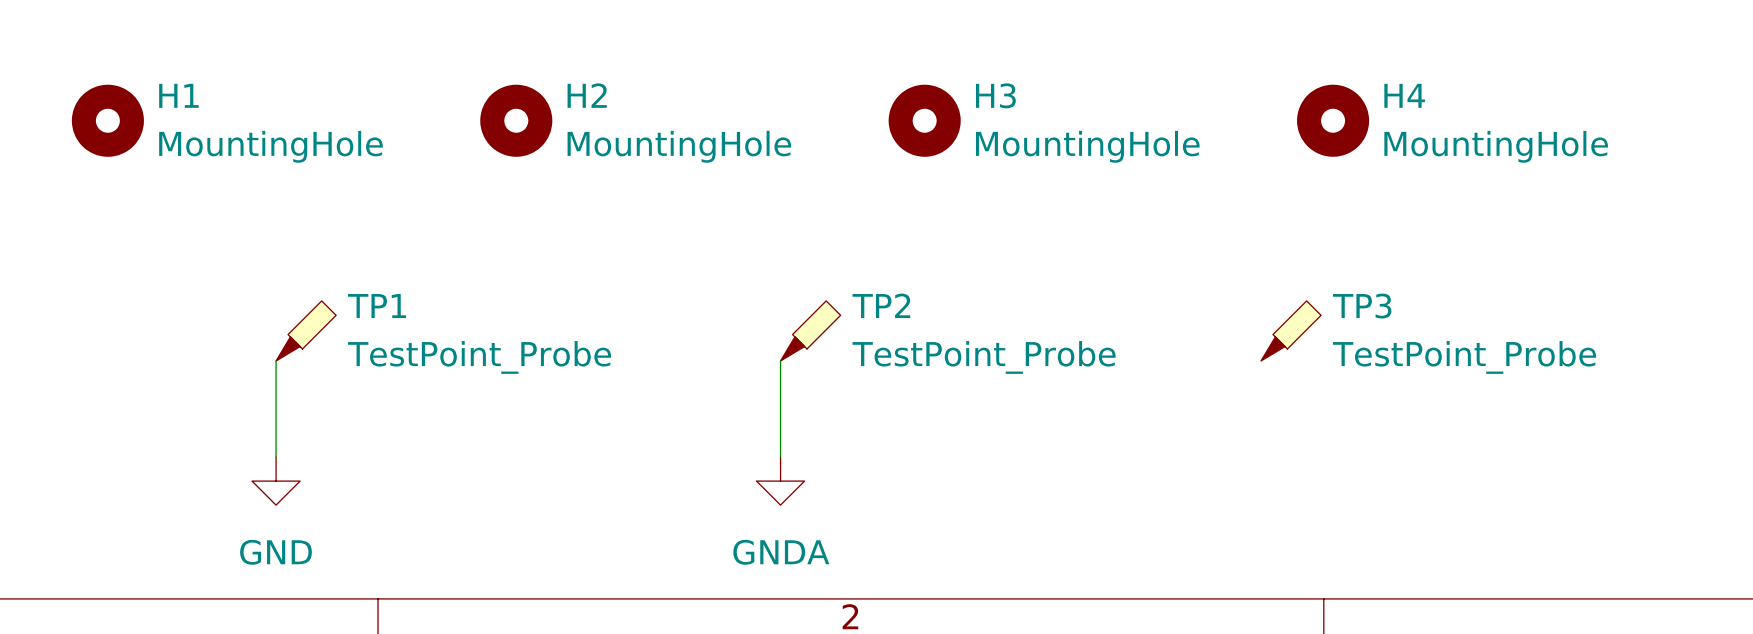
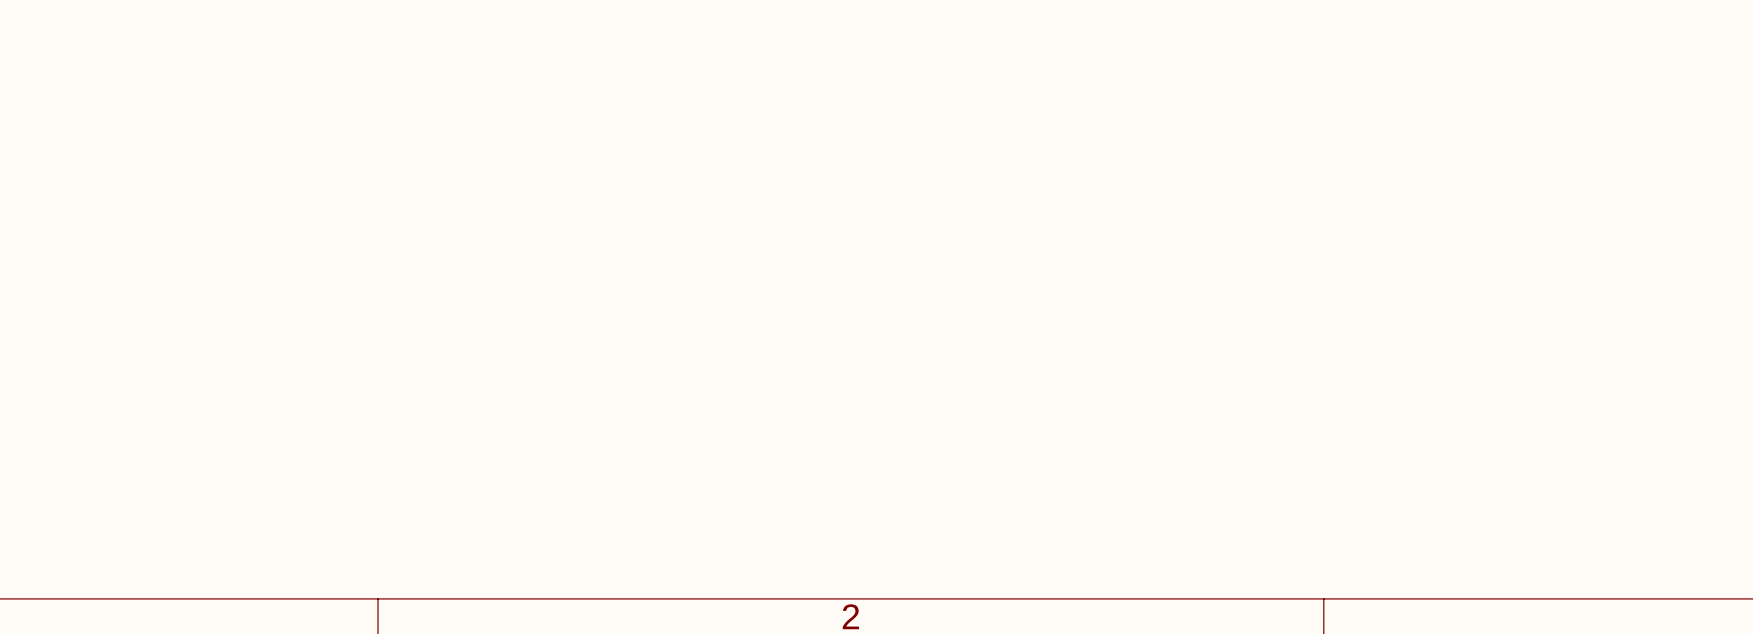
H1: MountingHole (107, 120) -> none
H2: MountingHole (516, 120) -> none
H3: MountingHole (924, 120) -> none
H4: MountingHole (1333, 120) -> none
TP1: TestPoint_Probe (306, 330) -> none
TP2: TestPoint_Probe (810, 330) -> none
TP3: TestPoint_Probe (1291, 330) -> none
wire: (276, 360) (276, 457) -> none
wire: (780, 360) (780, 457) -> none
power symbol: GND (276, 481) -> none
power symbol: GNDA (780, 481) -> none

